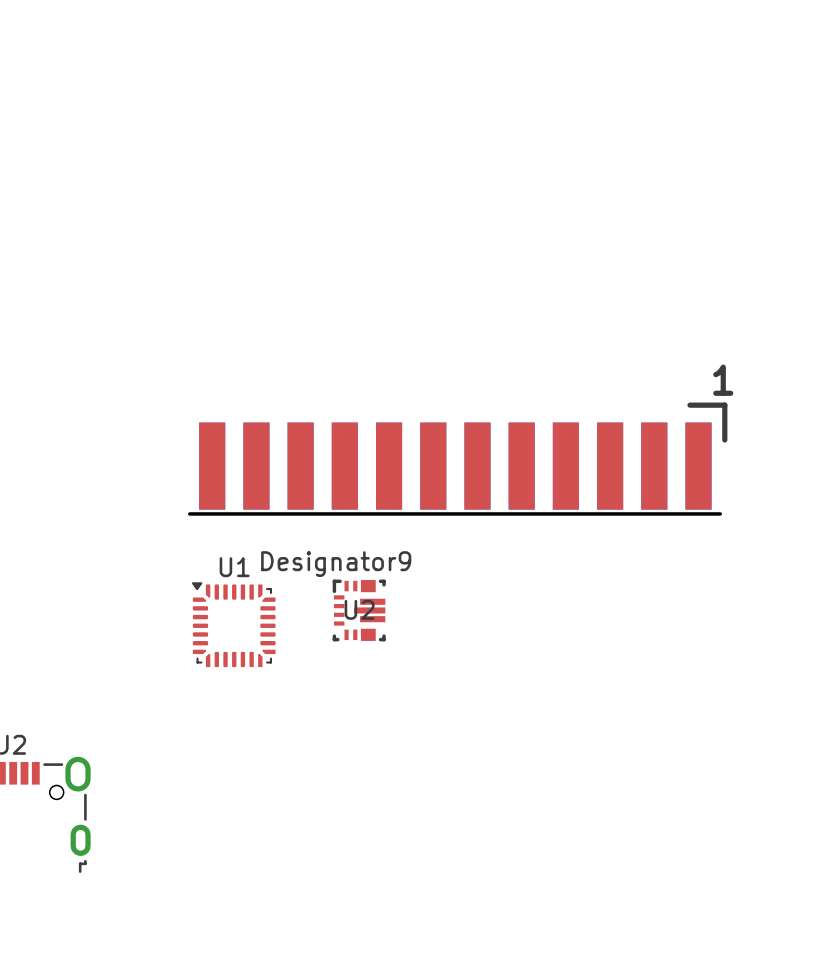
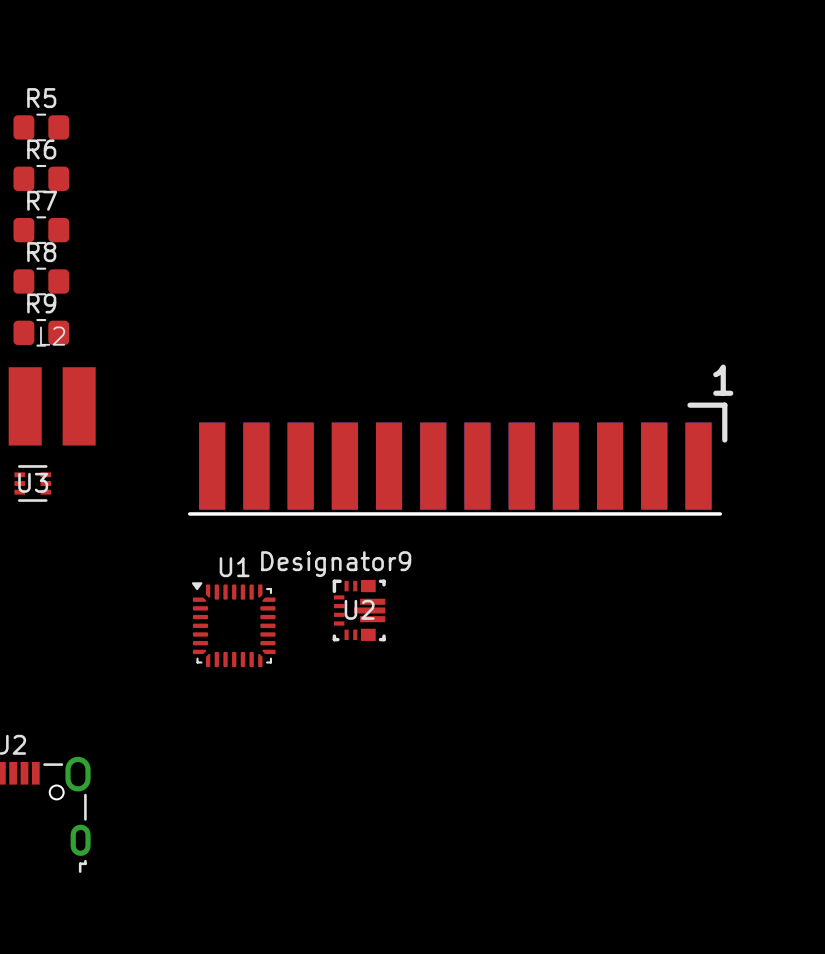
R5: none -> (41, 127)
R6: none -> (41, 178)
R7: none -> (41, 230)
R8: none -> (41, 281)
R9: none -> (41, 332)
L2: none -> (52, 406)
U3: none -> (32, 483)

